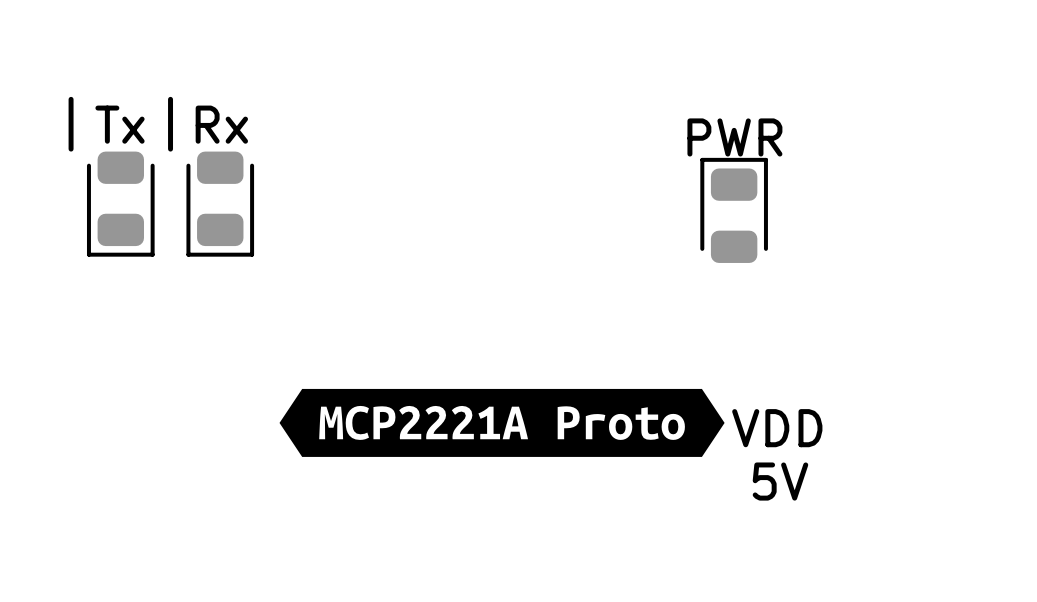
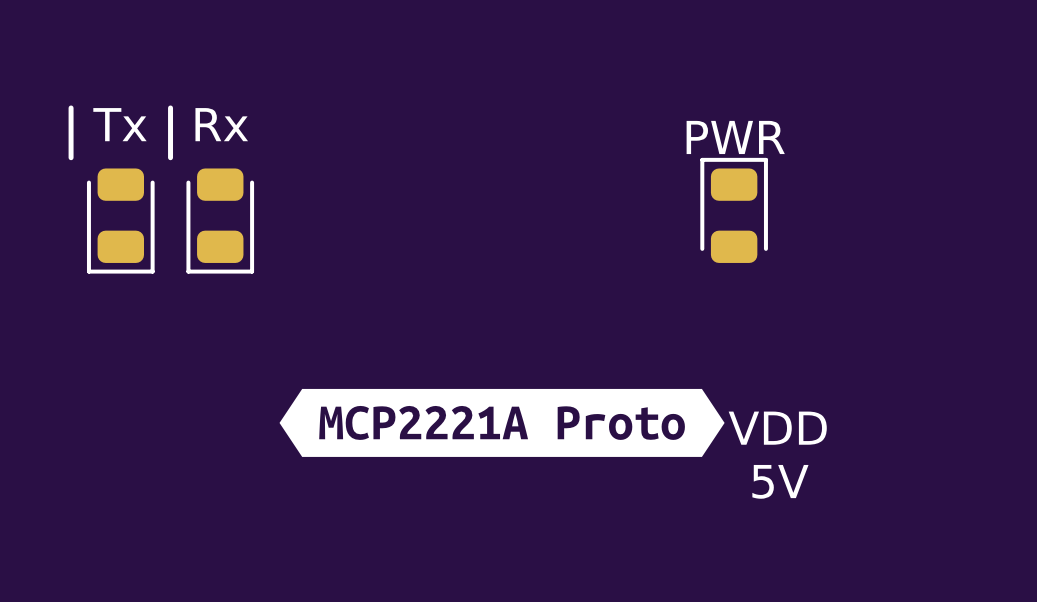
line: (71, 99) (71, 107) -> (71, 149) (71, 157)
line: (170, 99) (170, 107) -> (170, 149) (170, 157)
part position: (120, 204) -> (120, 221)
part position: (220, 204) -> (220, 221)

